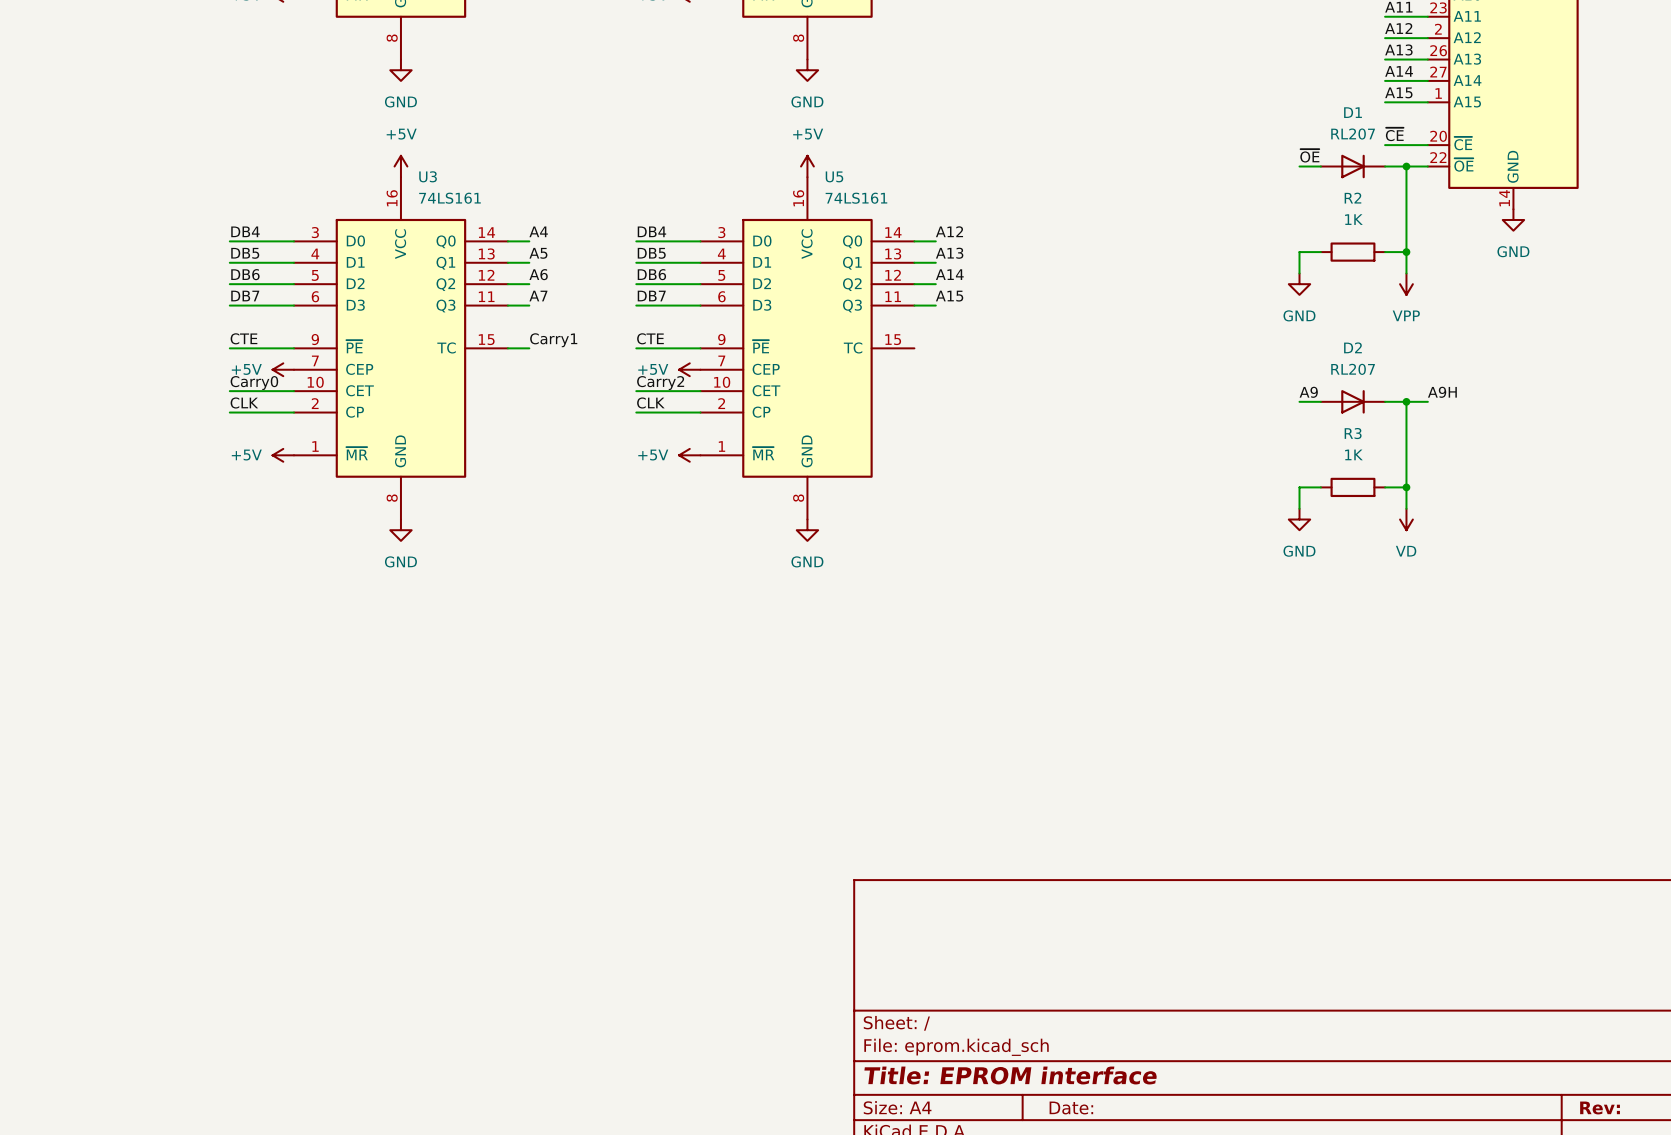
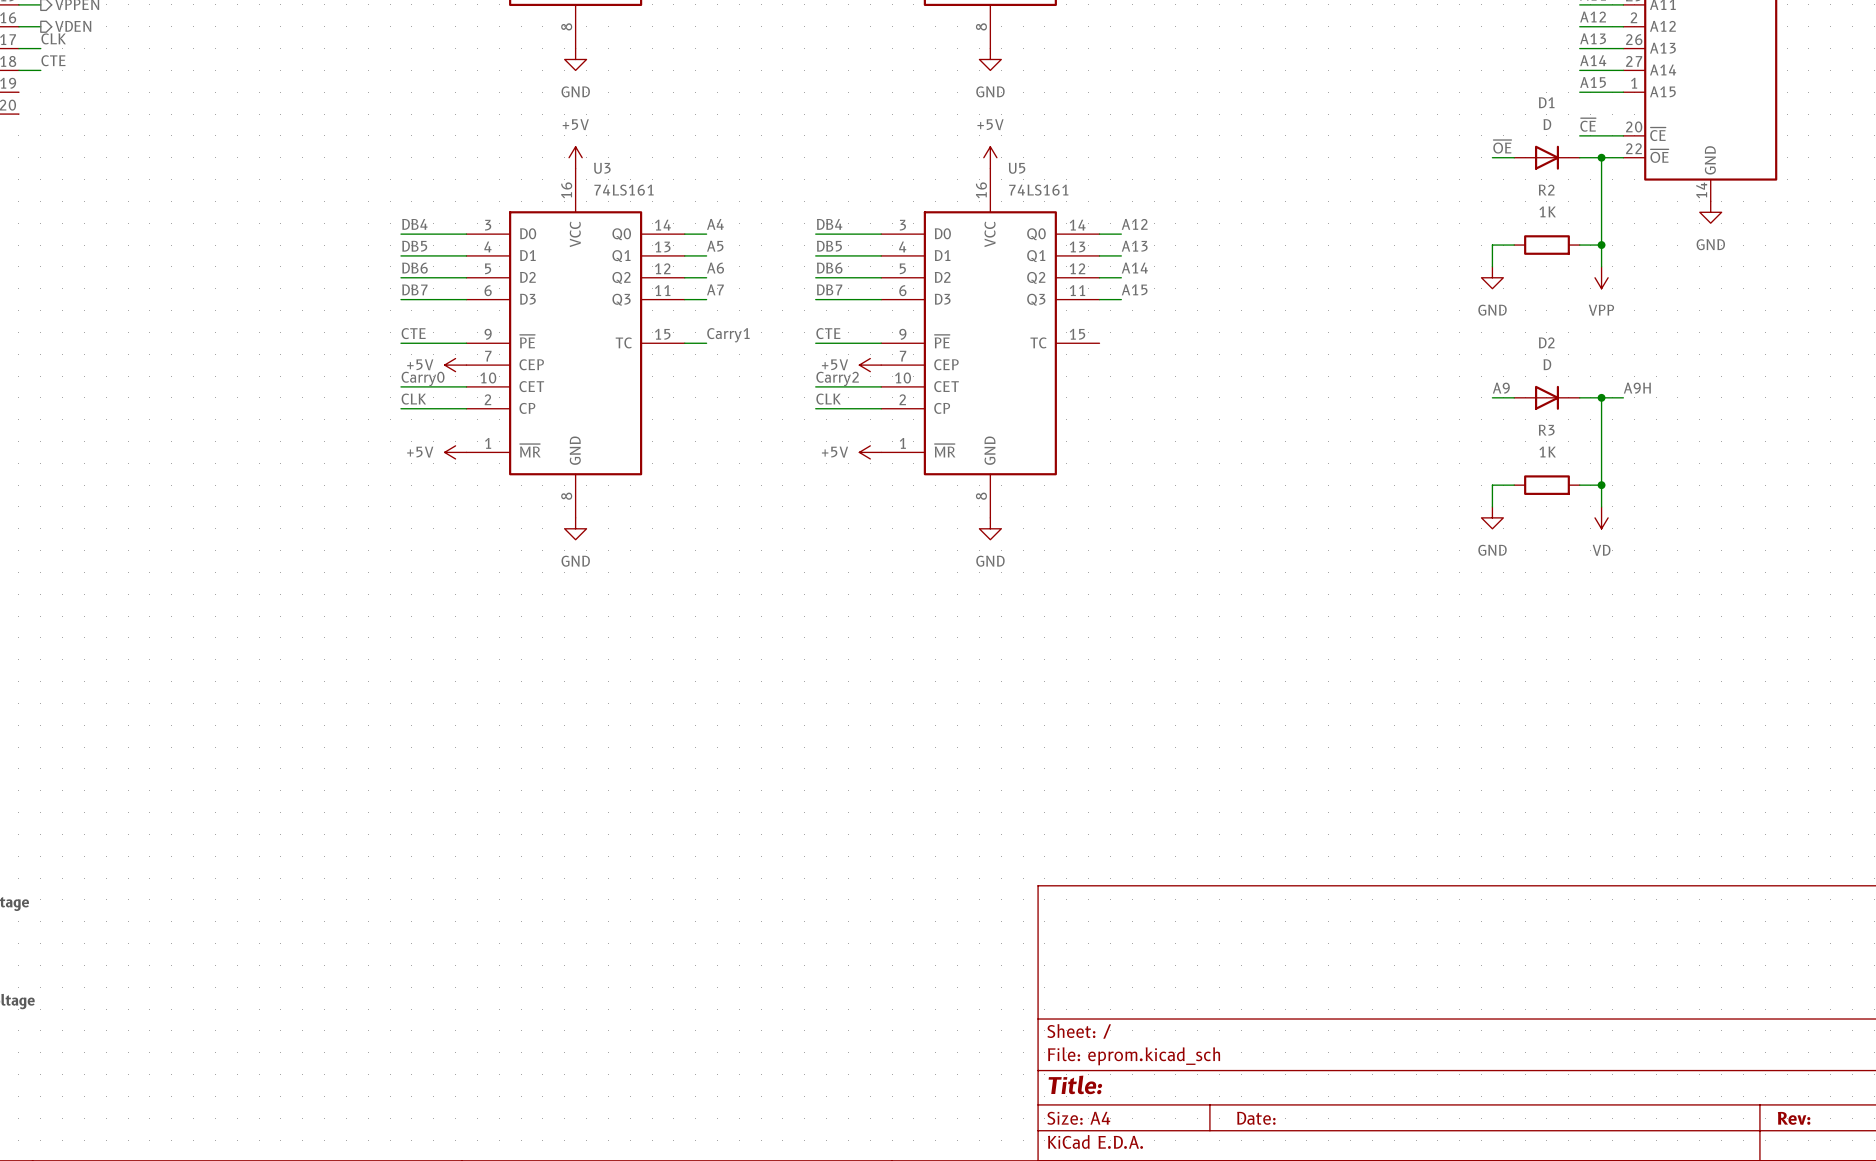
D1 value: RL207 (1353, 134) -> D (1547, 124)
D2 value: RL207 (1353, 369) -> D (1547, 364)
title block: Title: EPROM interface (1010, 1075) -> Title: (1075, 1084)

